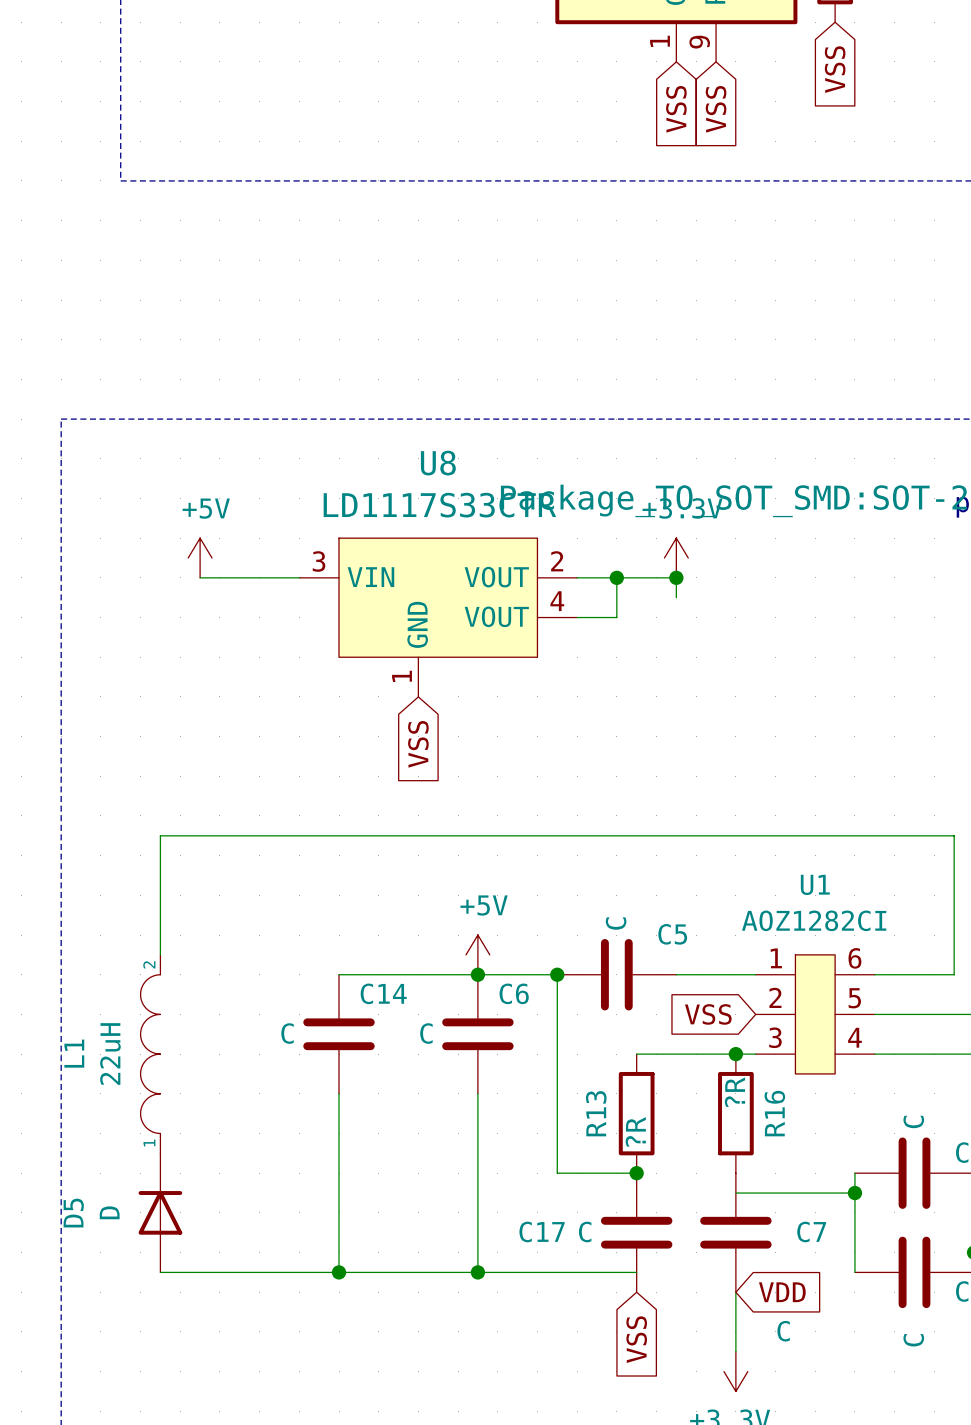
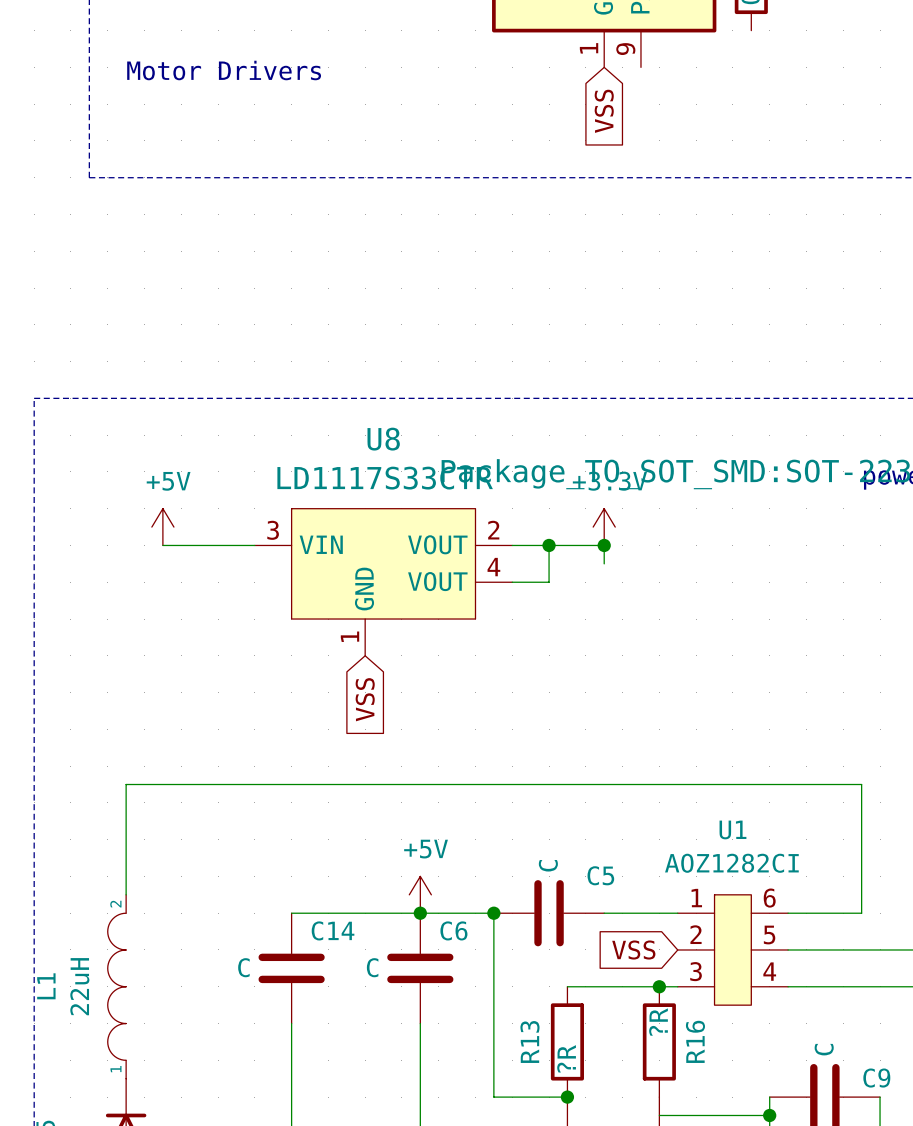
text: none -> Motor Drivers (224, 70)
global label: VSS (835, 69) -> none
global label: VSS (716, 109) -> none

